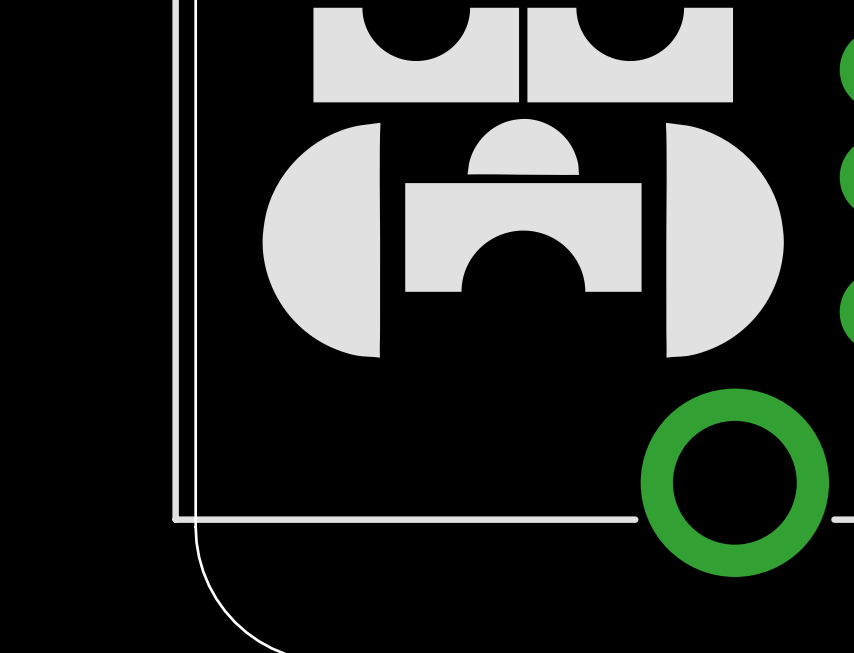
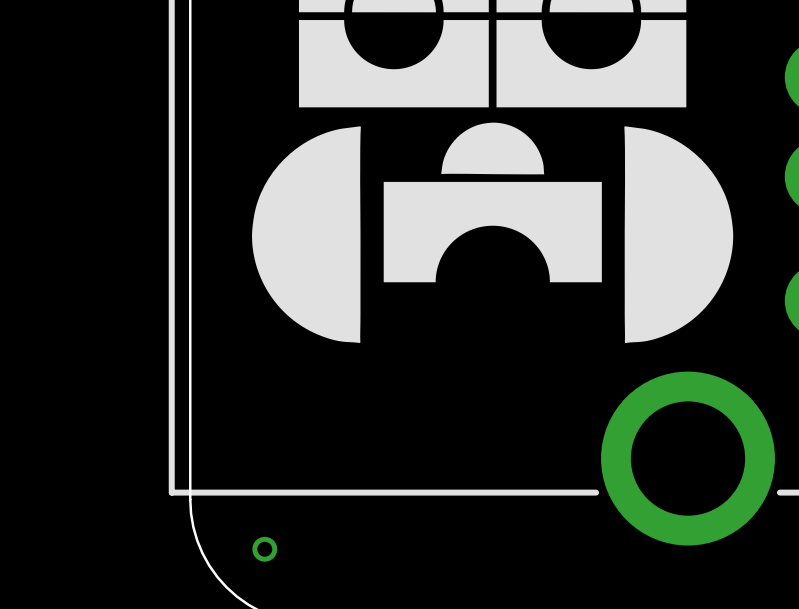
via: none -> (264, 549)

